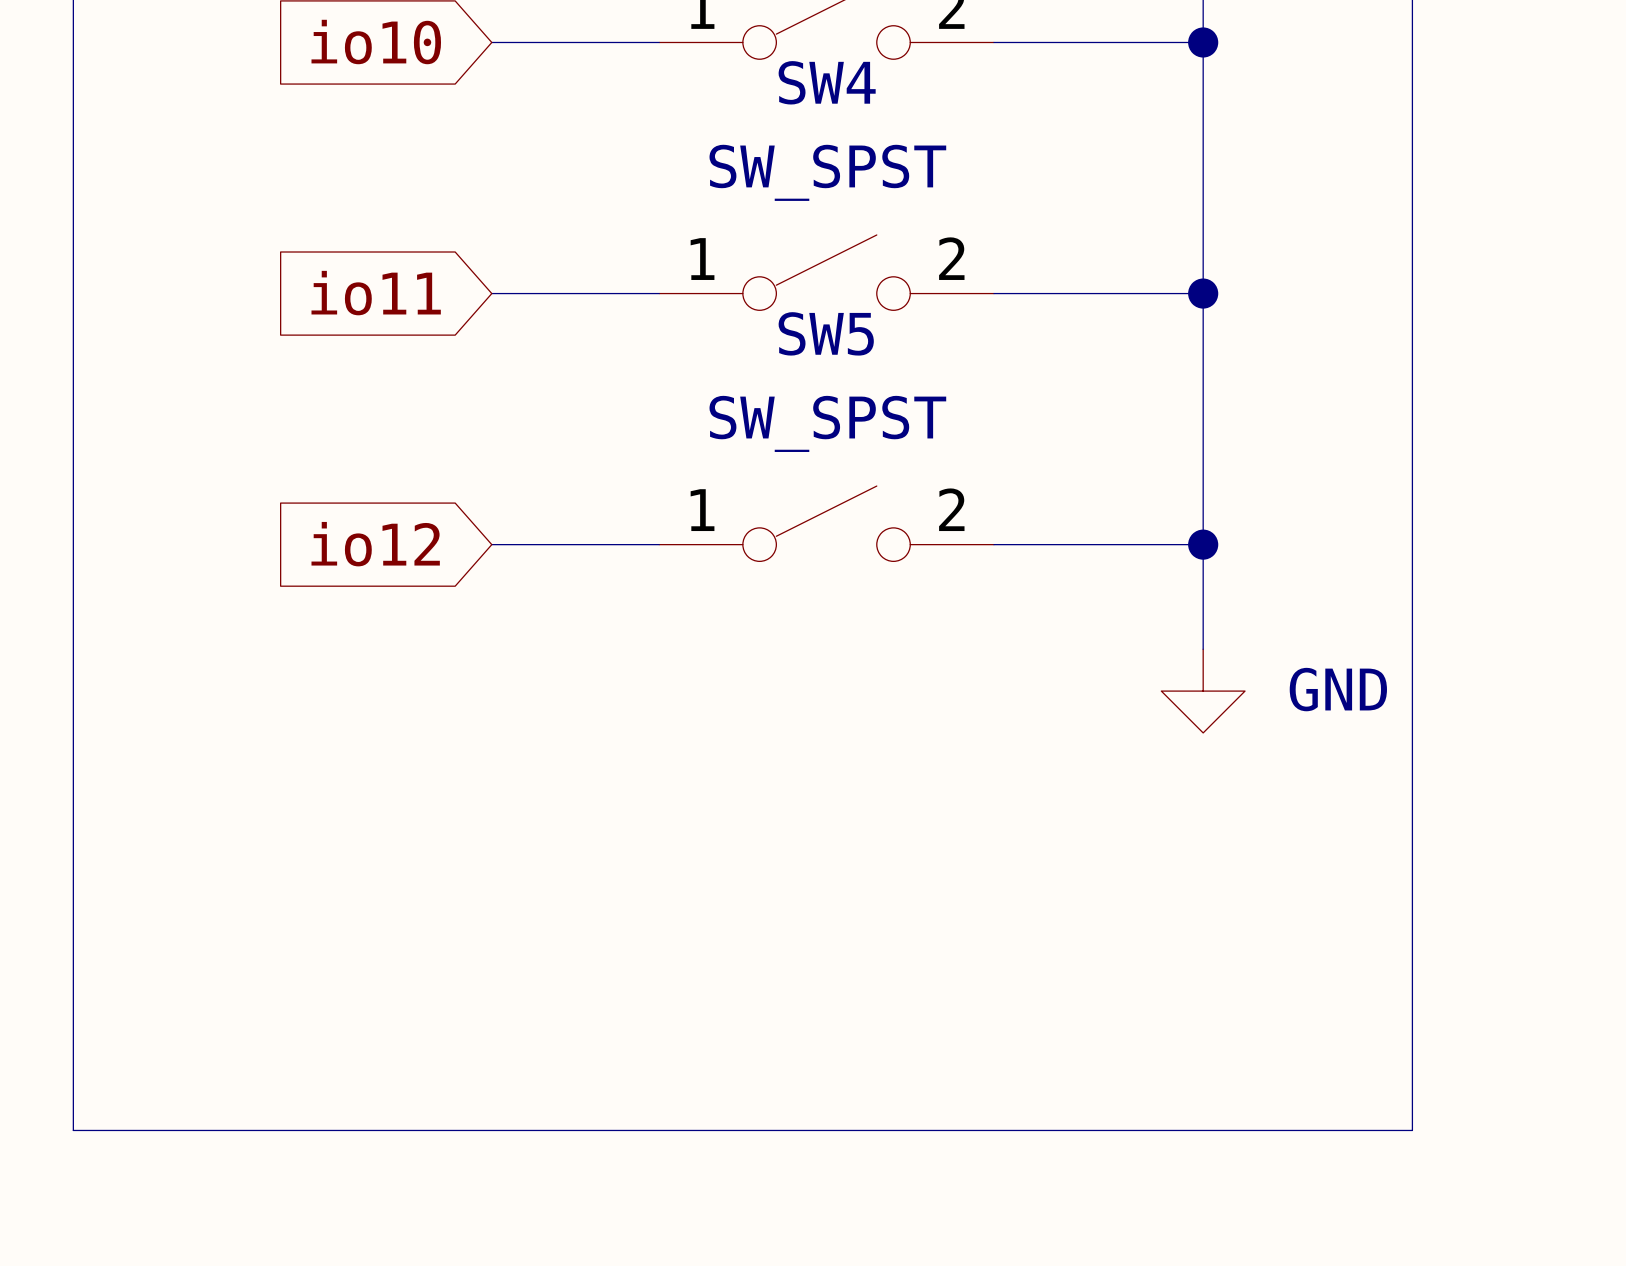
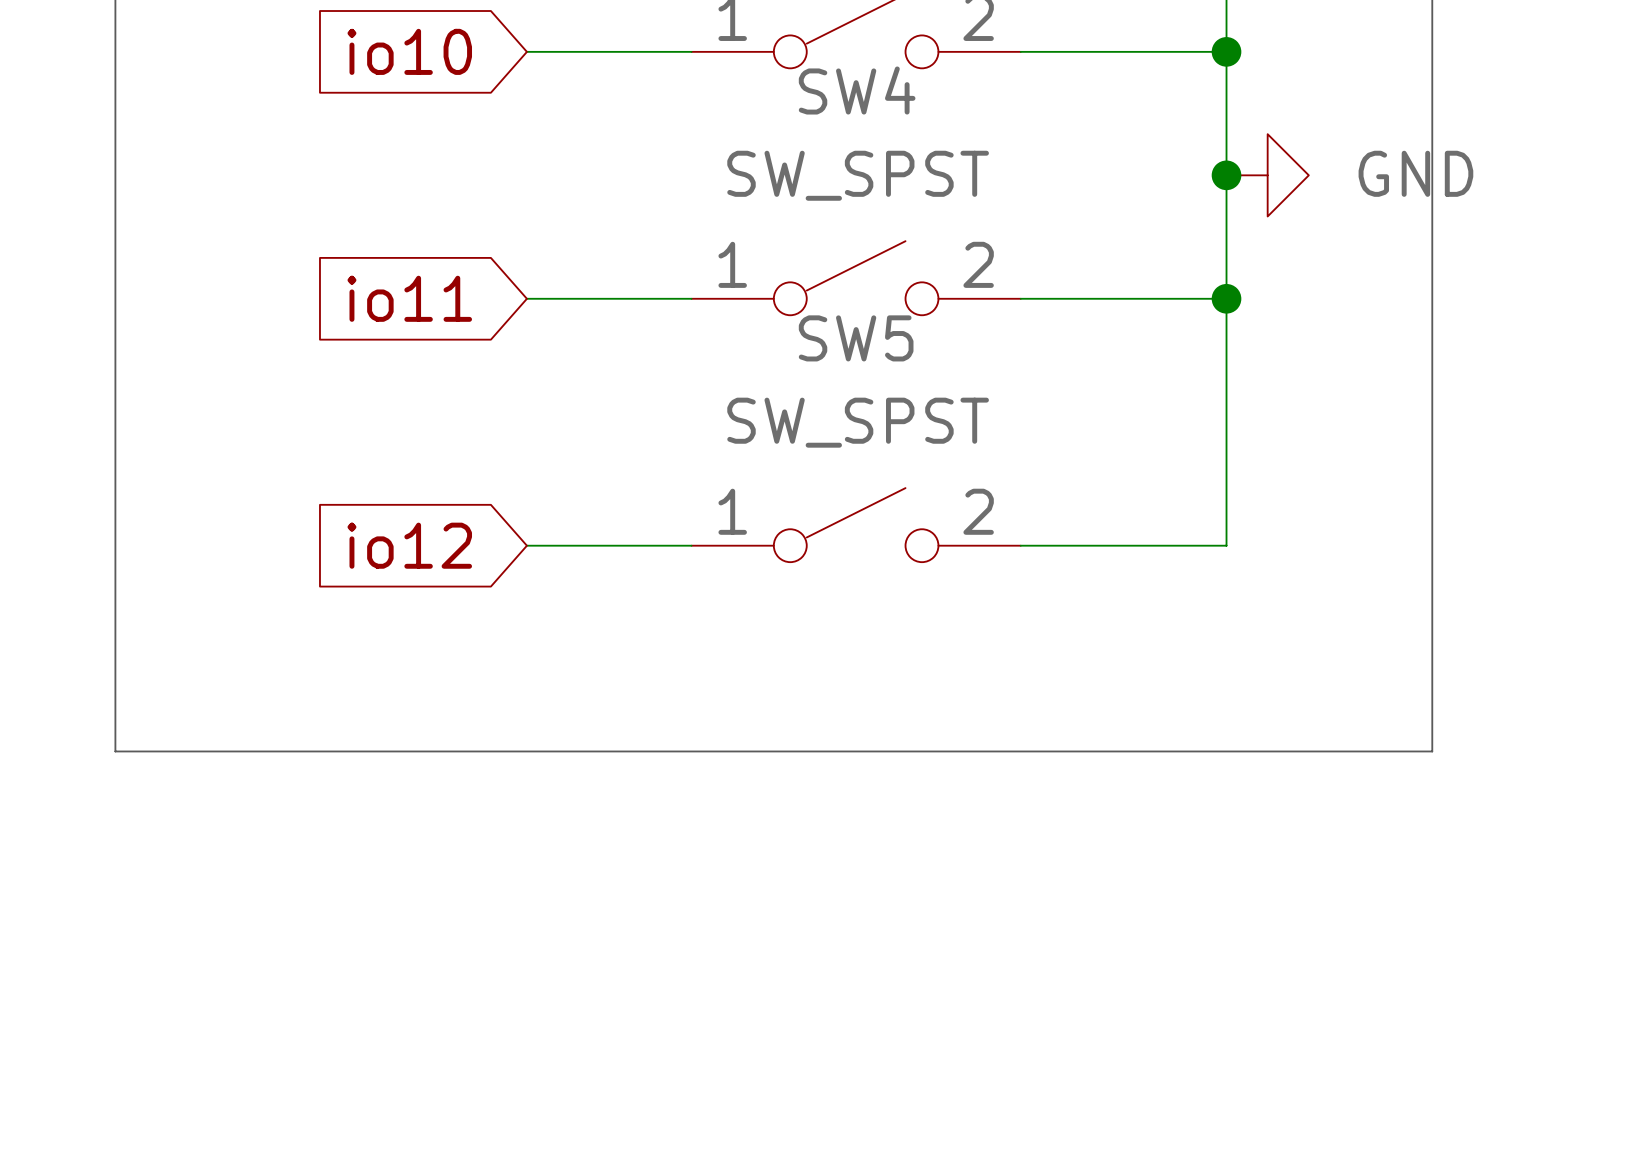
junction: none -> (1226, 175)
wire: (1203, 544) (1203, 649) -> none
junction: (1203, 544) -> none
power symbol rotation: 0° (1203, 691) -> 90° counterclockwise (1267, 175)
power symbol position: GND (1203, 691) -> GND (1267, 175)
line: (73, 753) (73, 1130) (1412, 1130) (1412, 753) -> (115, 751) (1432, 751)

